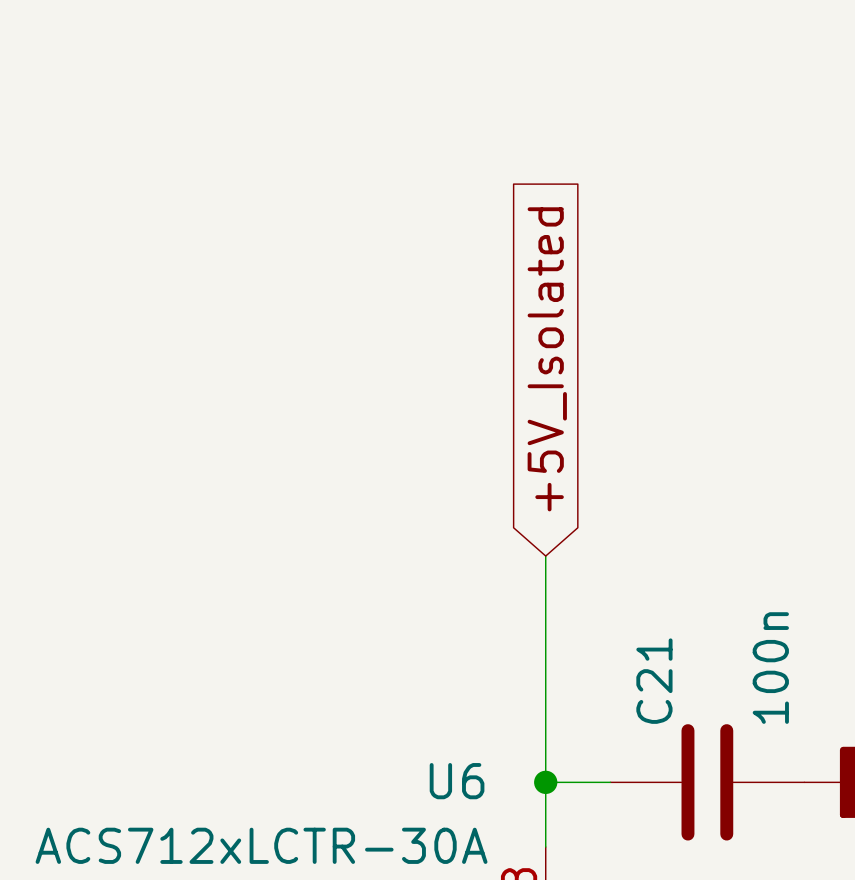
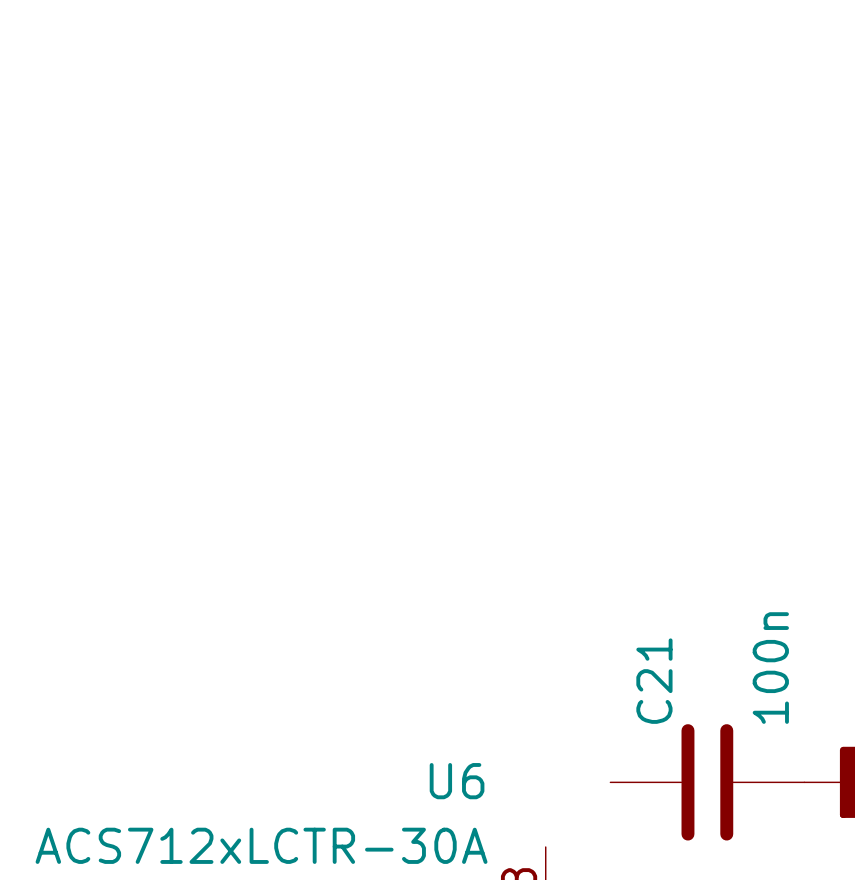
global label: +5V_Isolated (547, 359) -> none
wire: (545, 556) (545, 847) -> none
wire: (545, 782) (610, 782) -> none
junction: (545, 782) -> none

